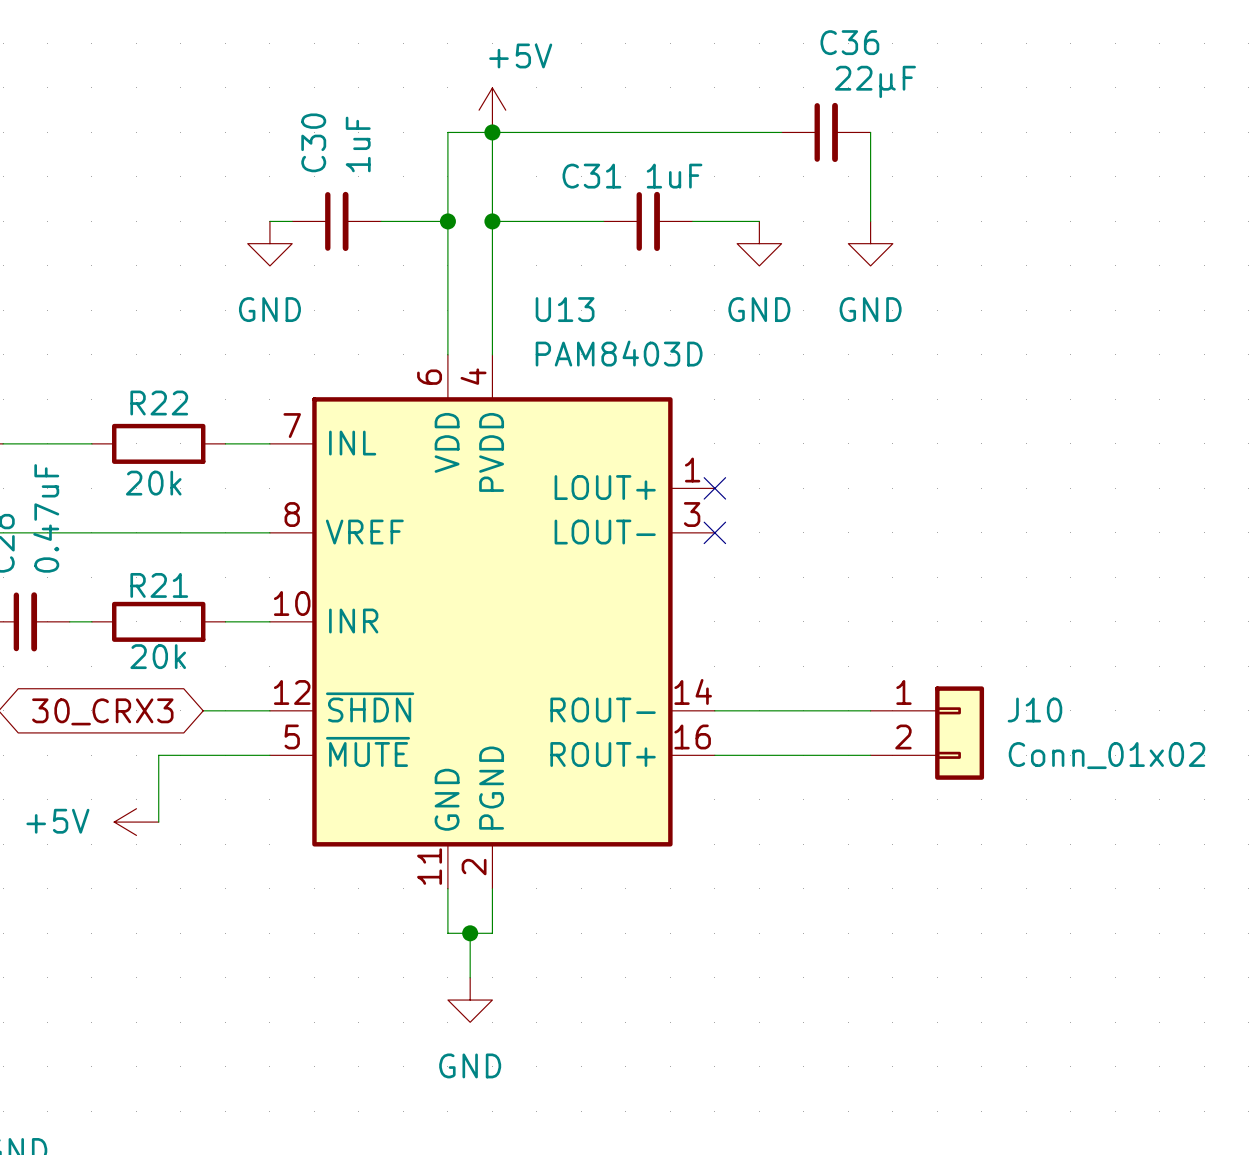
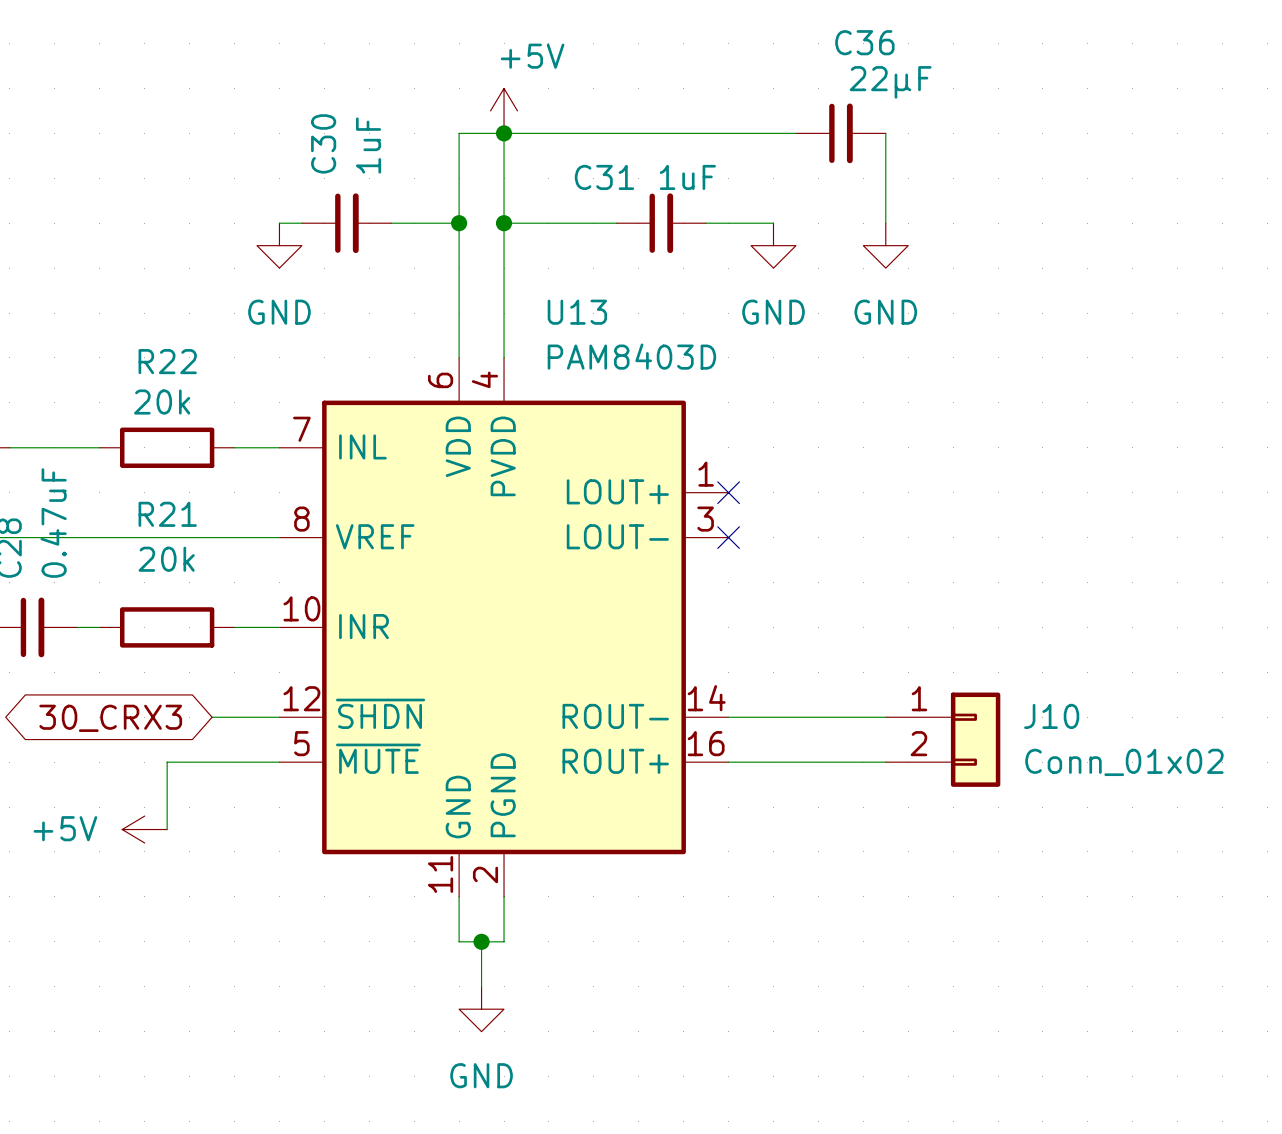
R22 name position: R22 (159, 403) -> R22 (167, 361)
R22 value position: 20k (153, 483) -> 20k (162, 402)
R21 name position: R21 (159, 585) -> R21 (167, 514)
R21 value position: 20k (158, 656) -> 20k (166, 559)

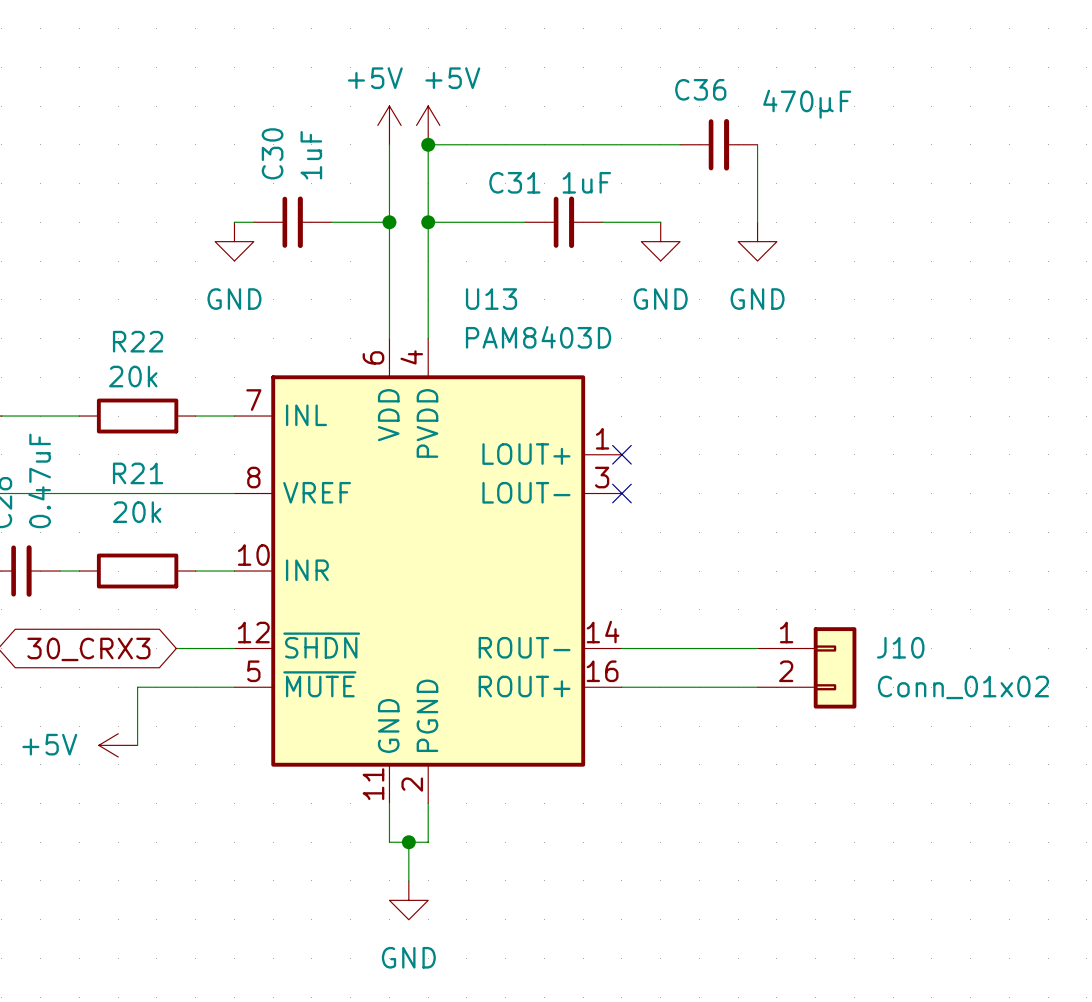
C36 name position: C36 (864, 42) -> C36 (700, 89)
C36 value: 22µF (890, 82) -> 470µF (807, 104)
power symbol: none -> +5V (389, 125)
wire: (459, 133) (504, 133) -> none

